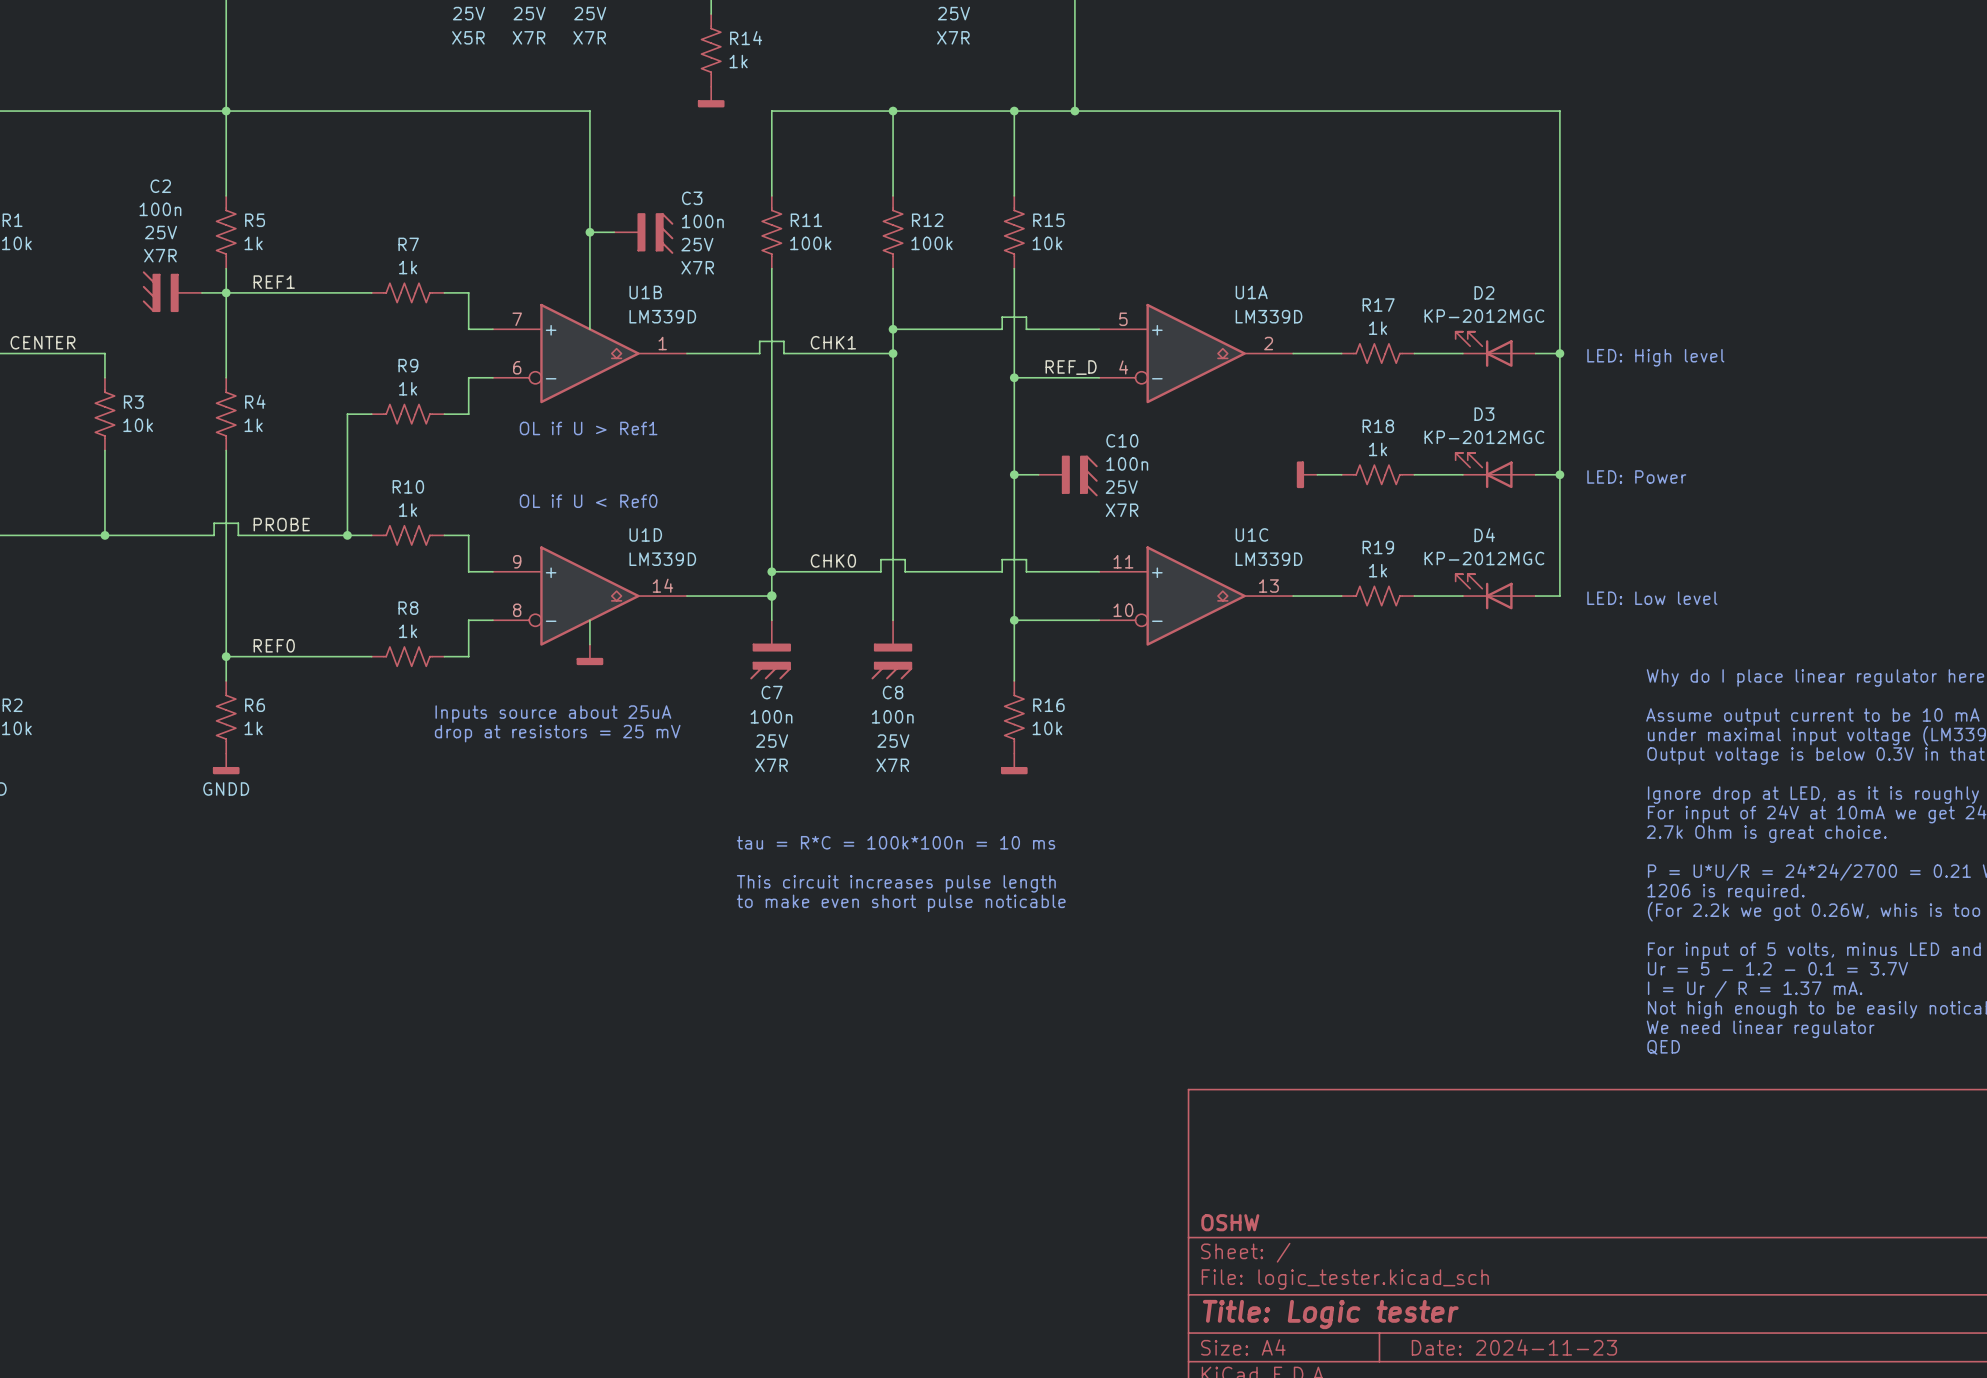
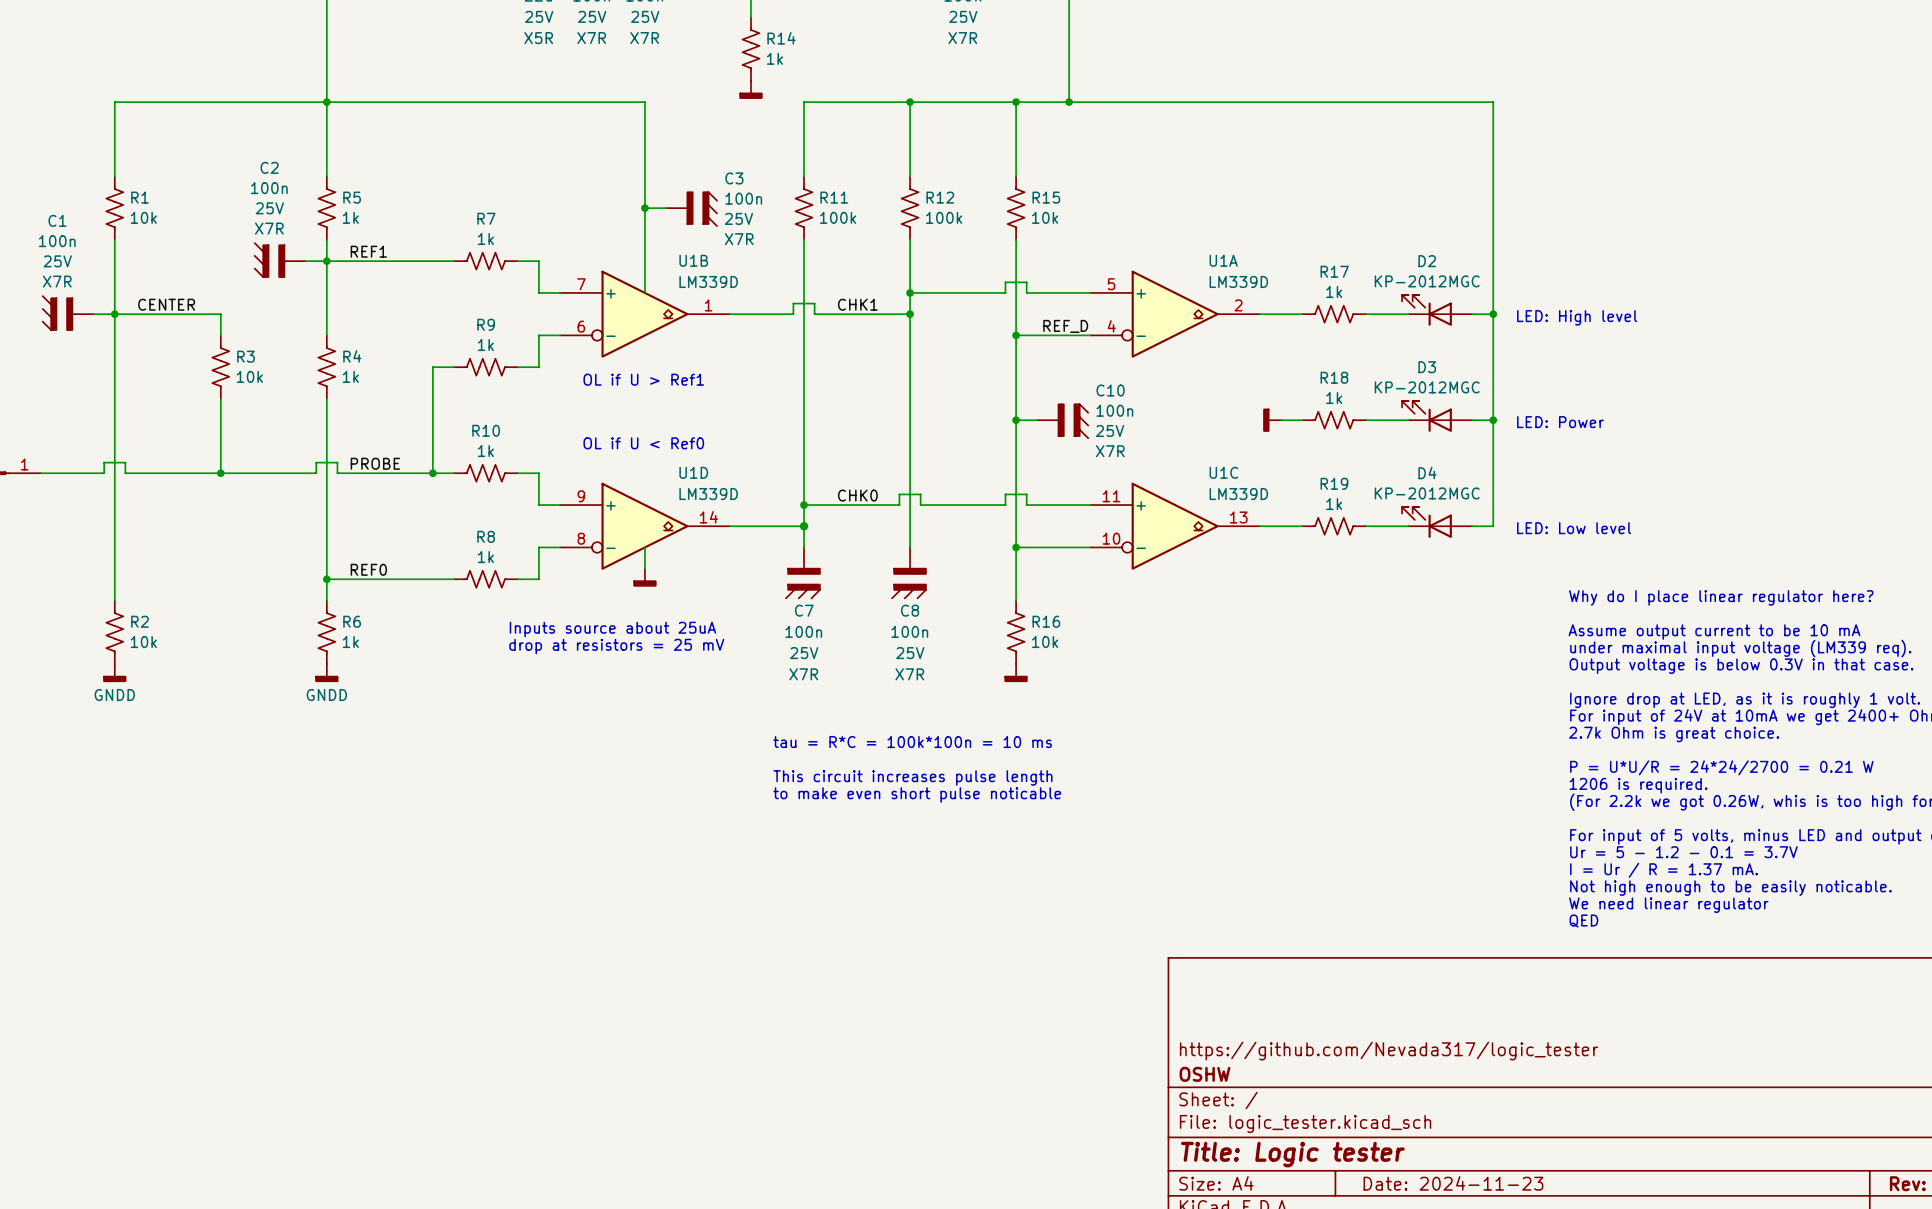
title block: none -> https://github.com/Nevada317/logic_tester (1389, 1051)

